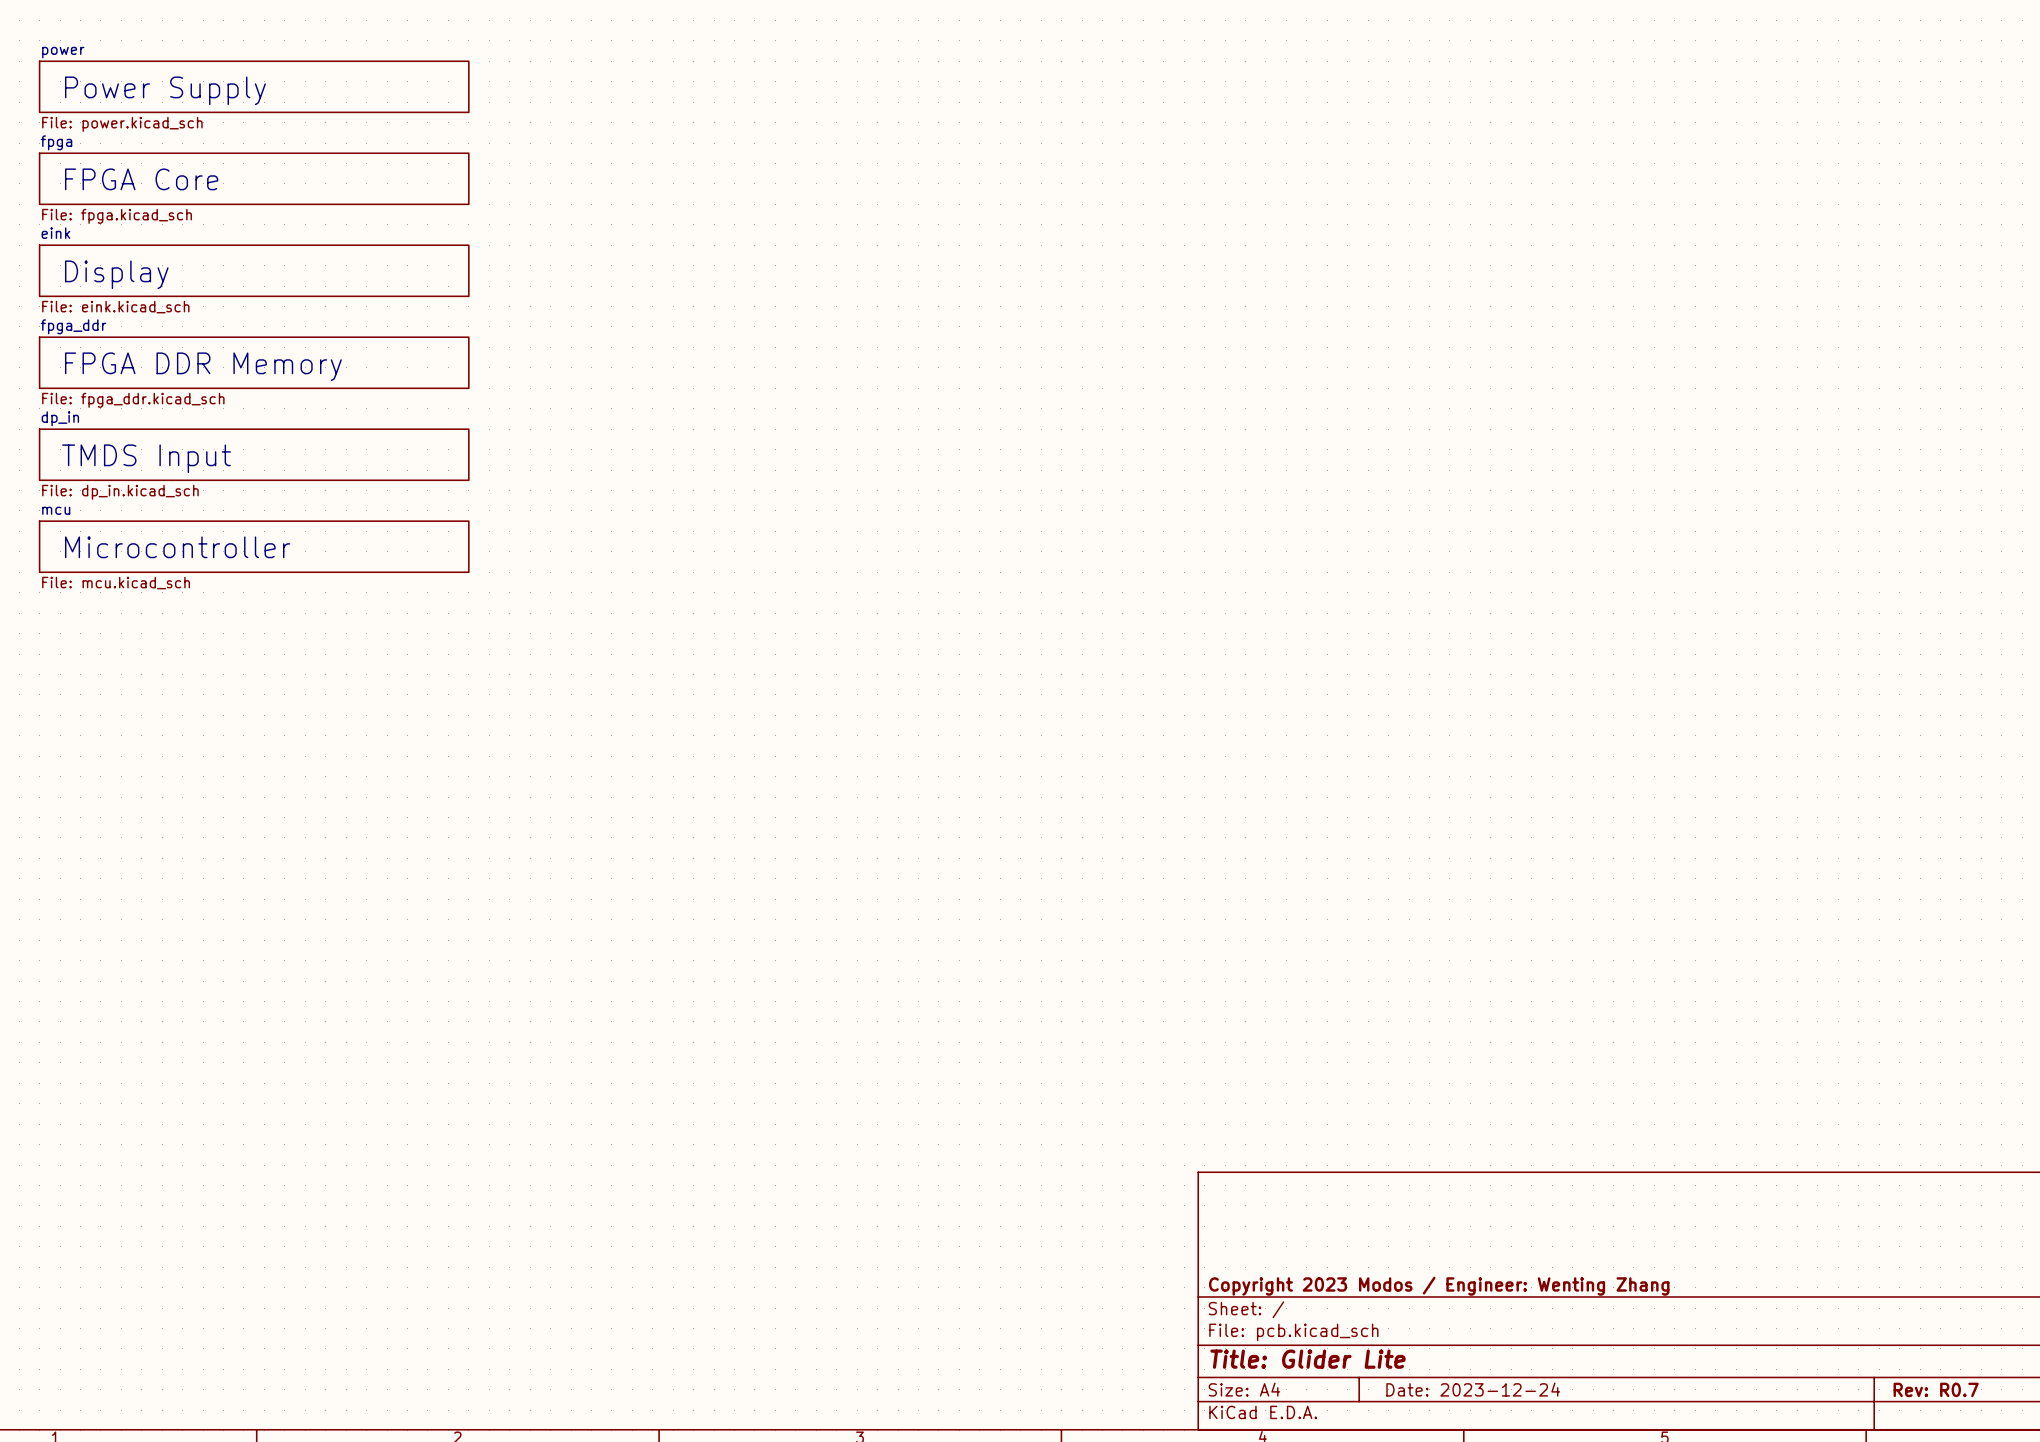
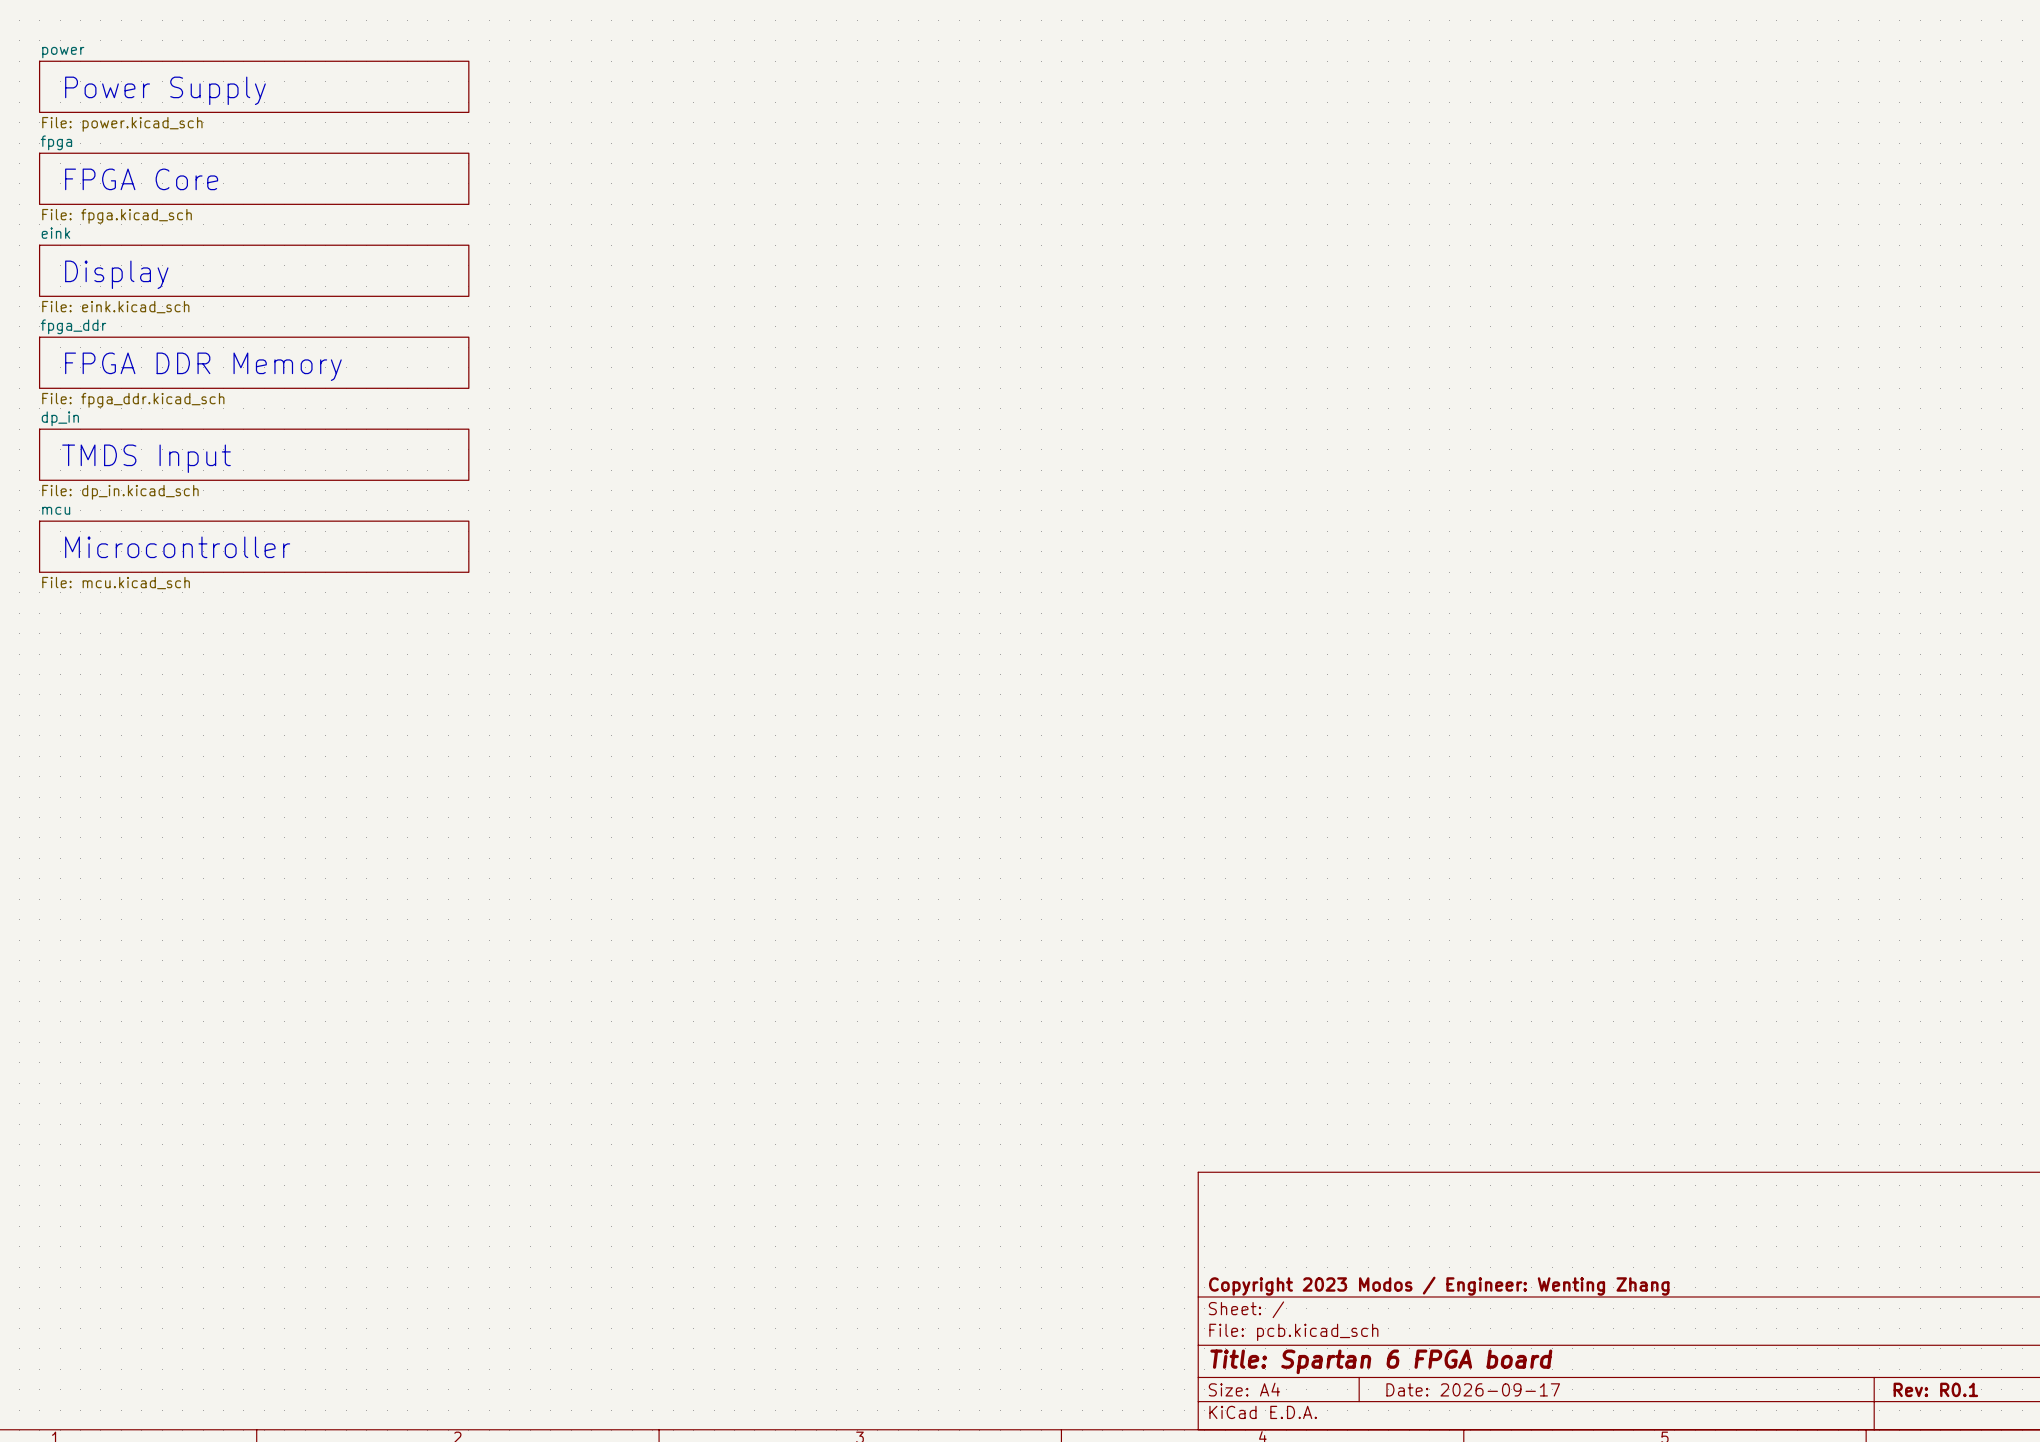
title block: Title: Glider Lite (1308, 1359) -> Title: Spartan 6 FPGA board (1381, 1361)
title block: Date: 2023-12-24 (1473, 1389) -> Date: 2026-09-17 (1473, 1389)
title block: Rev: R0.7 (1936, 1389) -> Rev: R0.1 (1935, 1389)

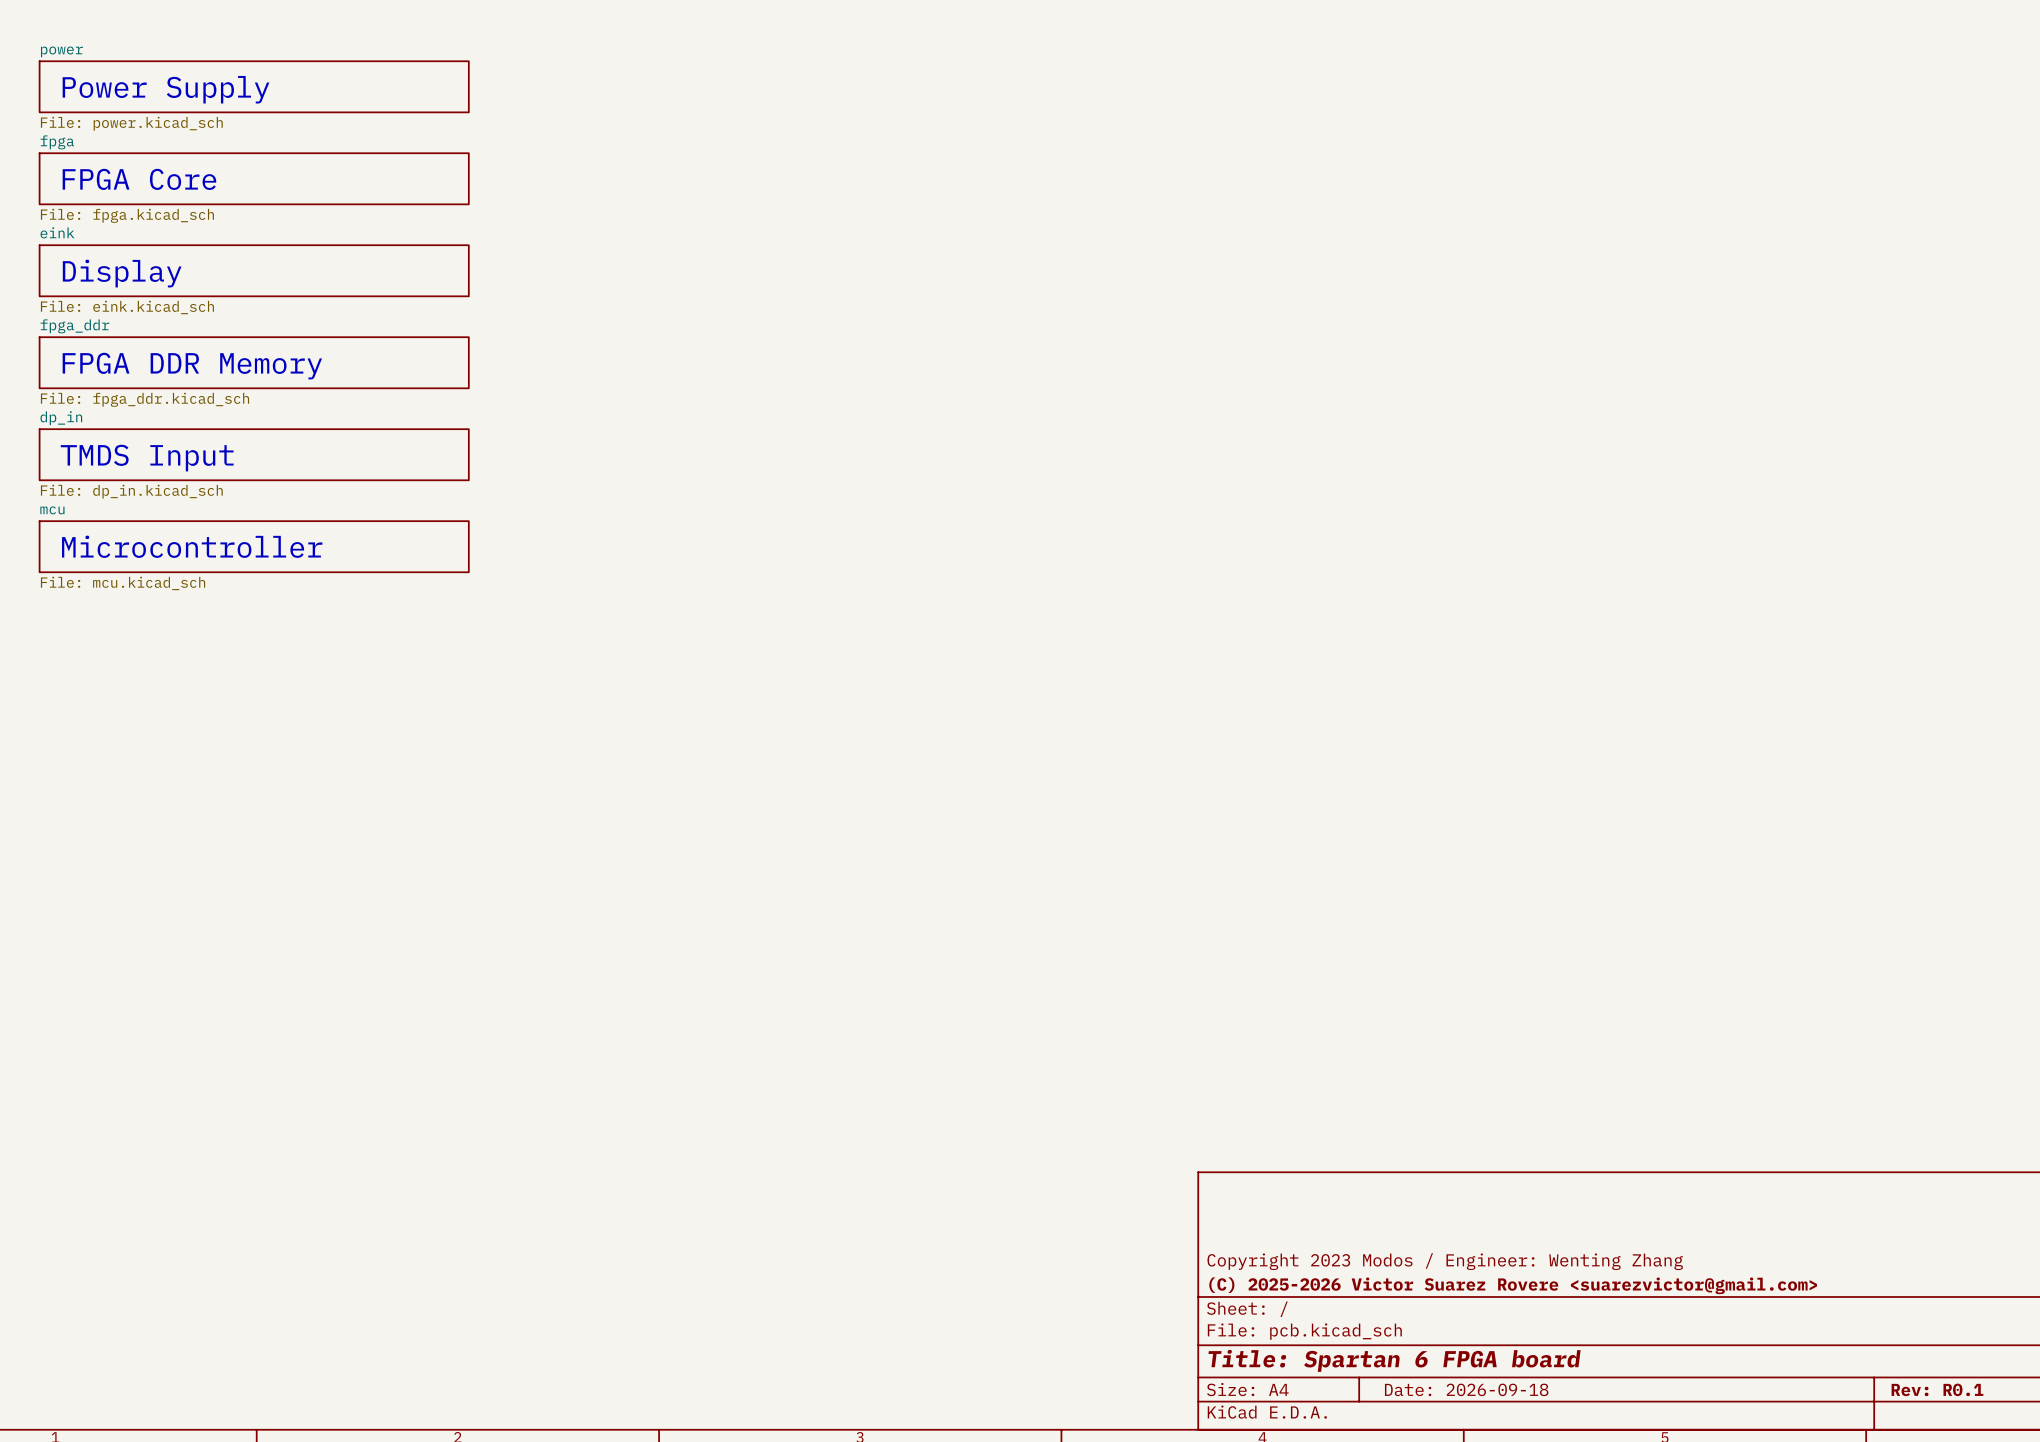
title block: none -> Copyright 2023 Modos / Engineer: Wenting Zhang (1445, 1261)
title block: Copyright 2023 Modos / Engineer: Wenting Zhang (1439, 1286) -> (C) 2025-2026 Victor Suarez Rovere <suarezvictor@gmail.com> (1513, 1285)
title block: Date: 2026-09-17 (1473, 1389) -> Date: 2026-09-18 (1466, 1389)

